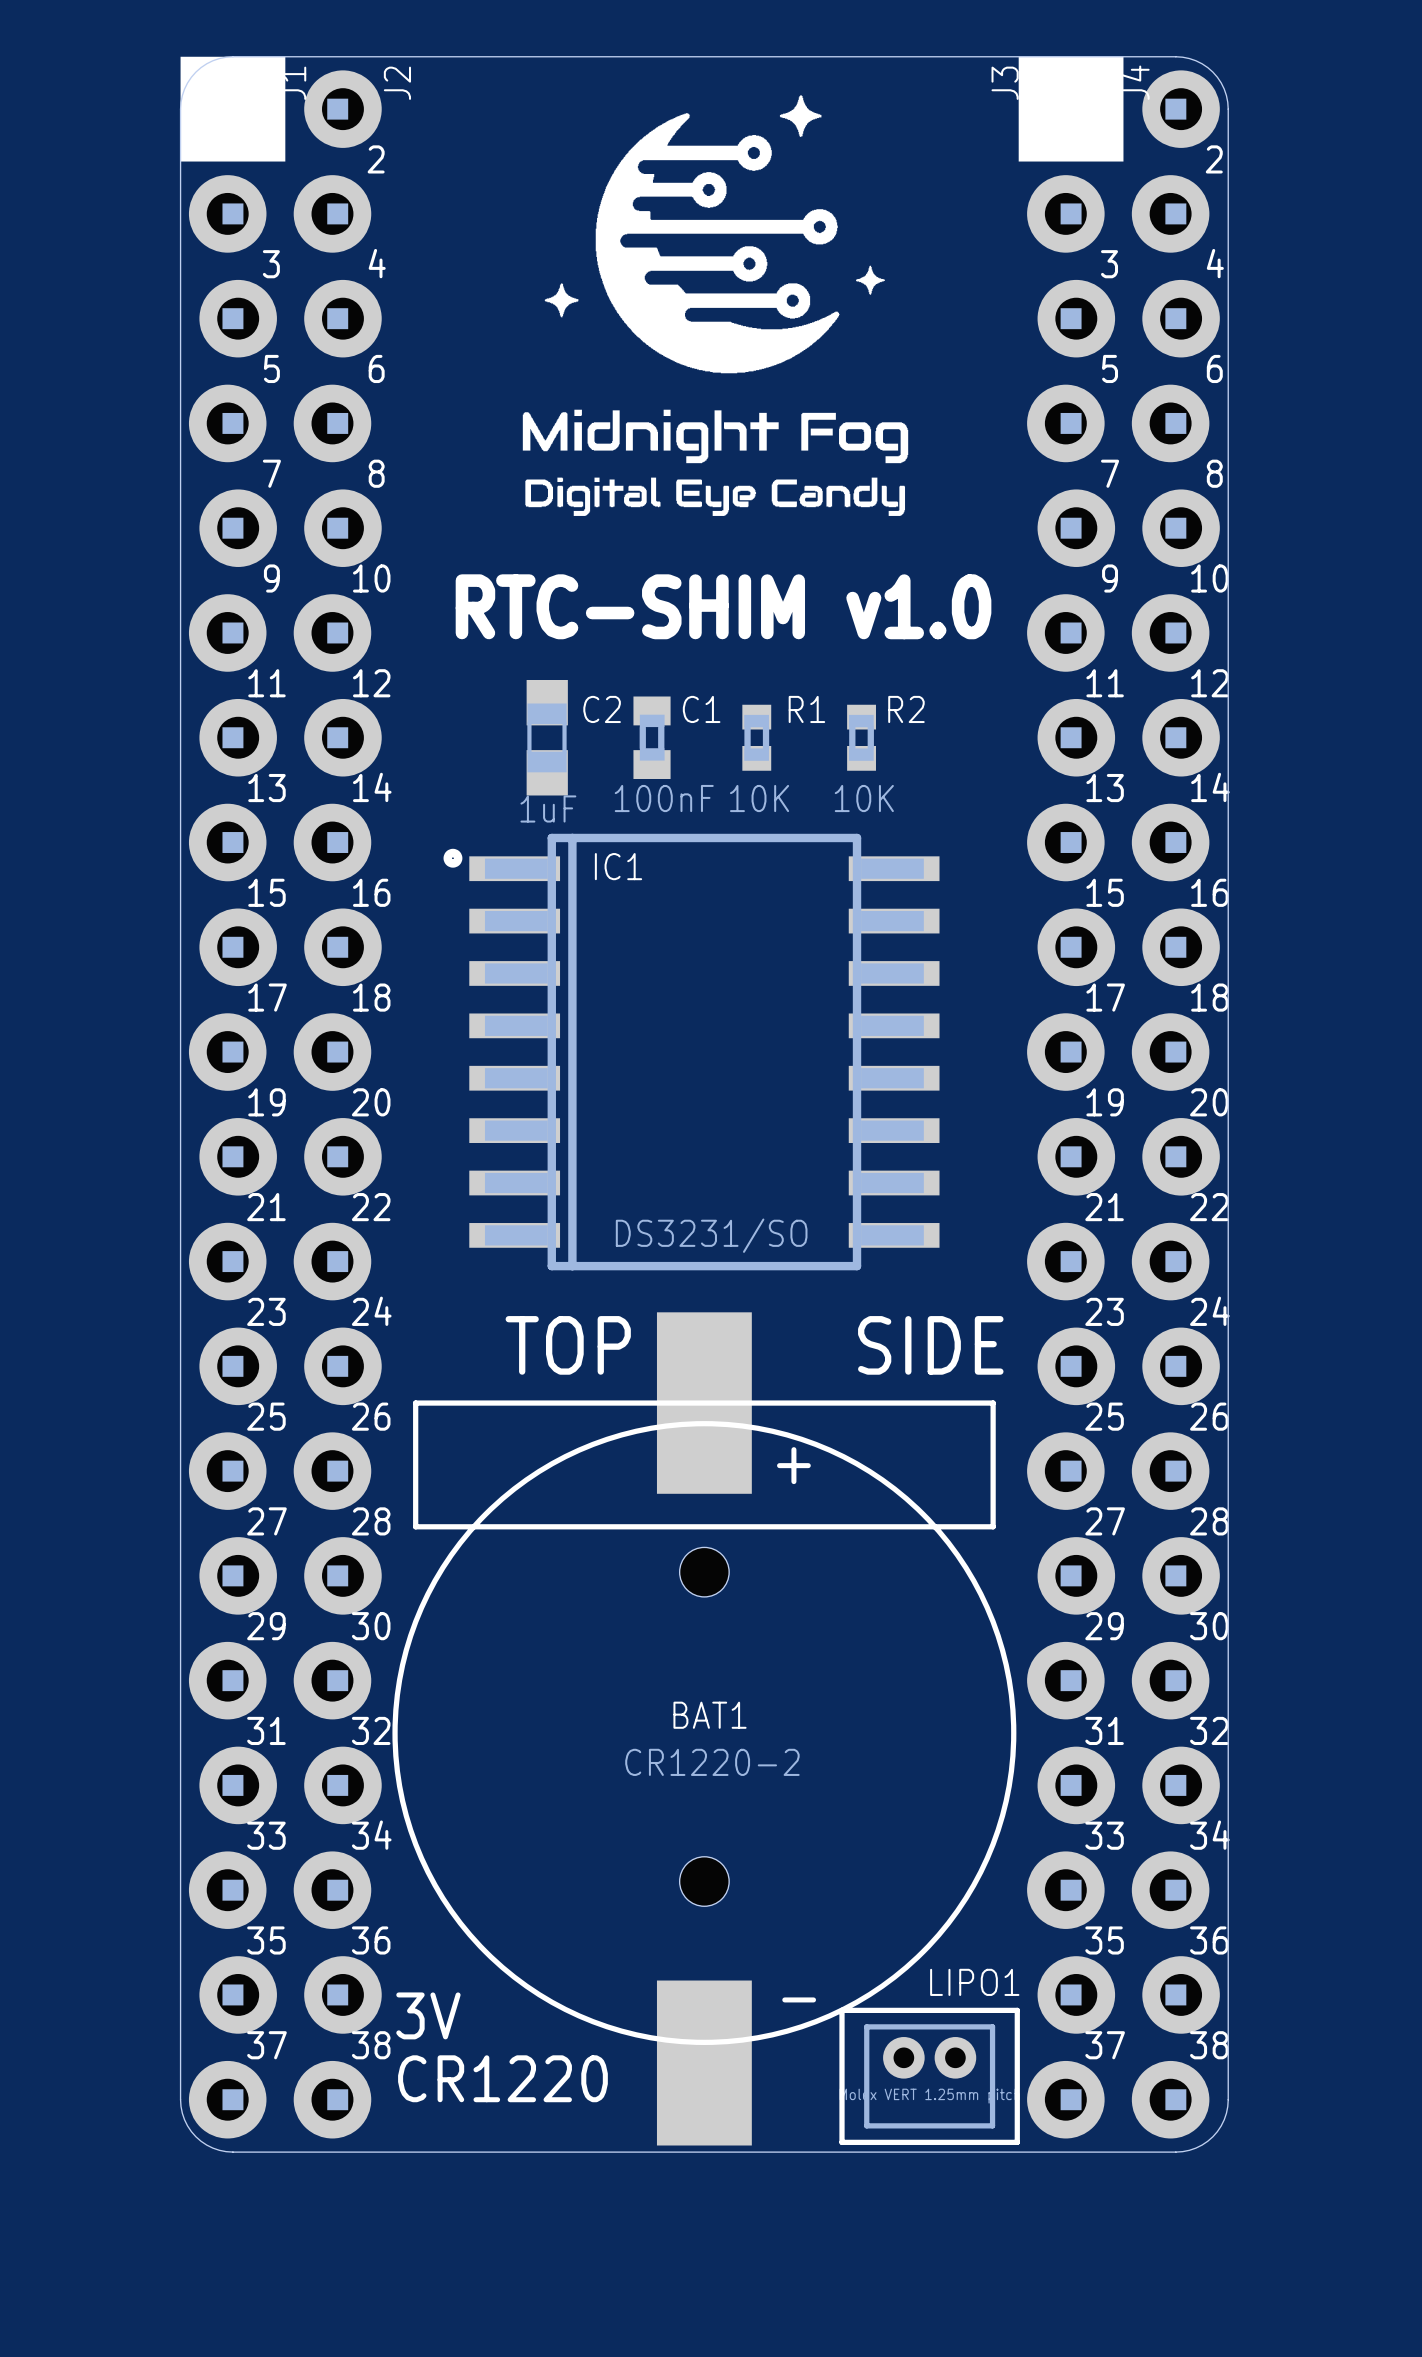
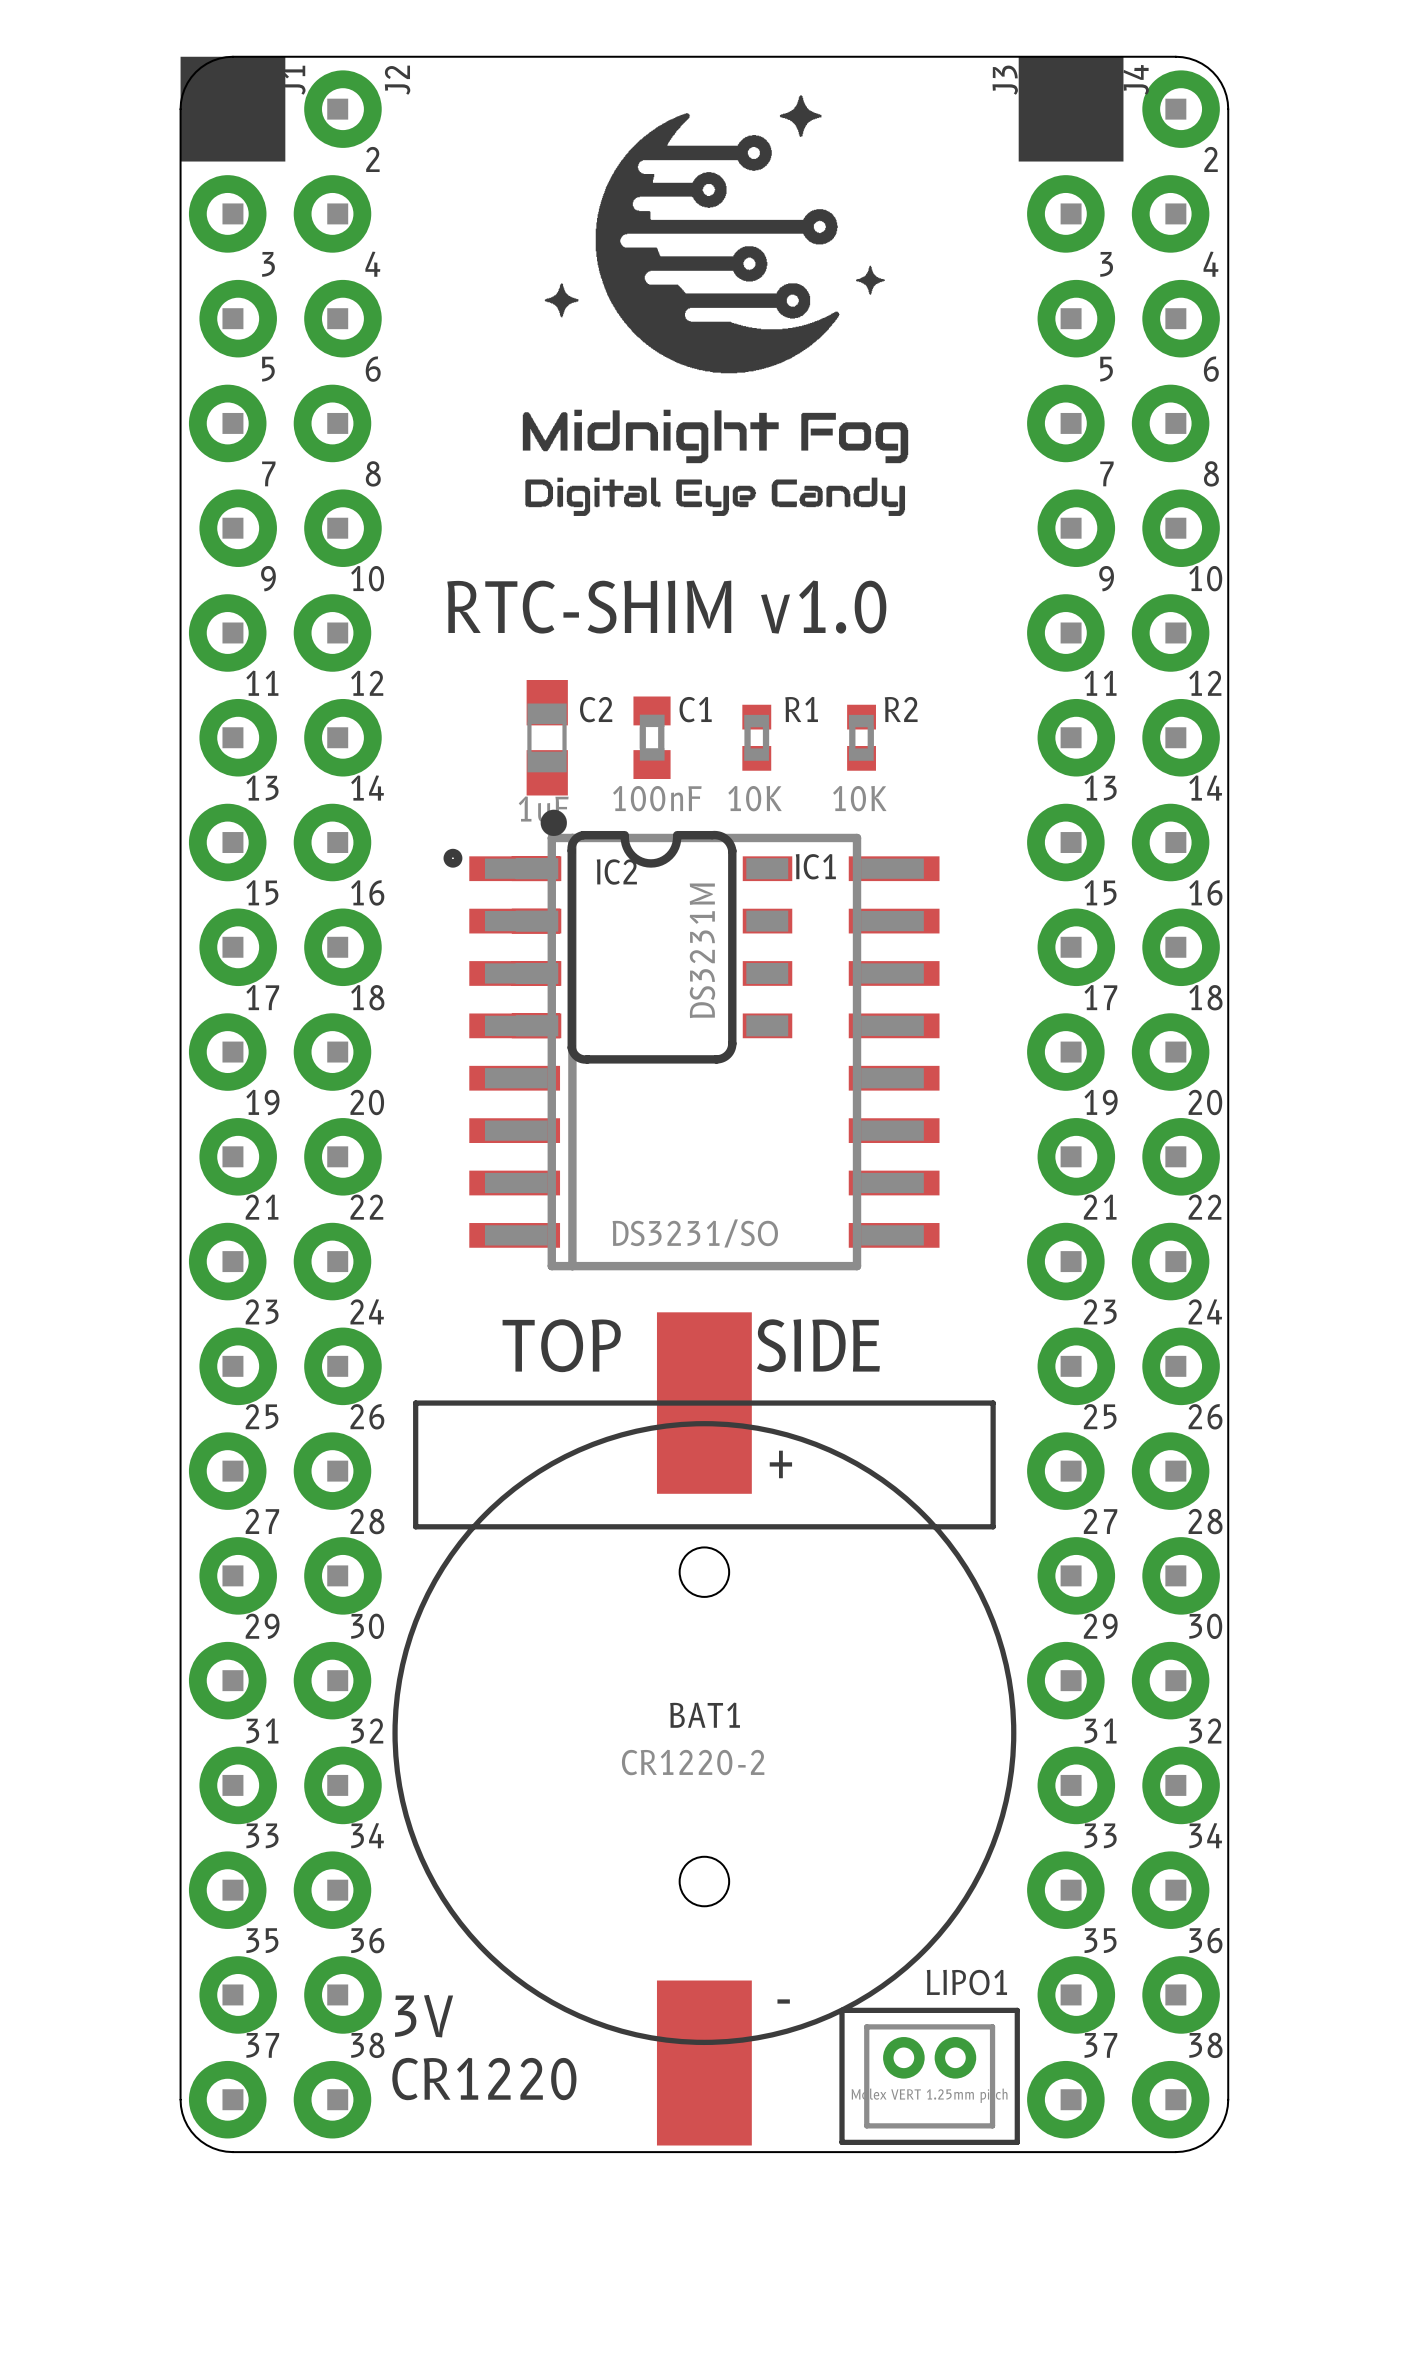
IC1 name position: IC1 (618, 866) -> IC1 (815, 866)
IC2: none -> DS3231M (652, 936)

